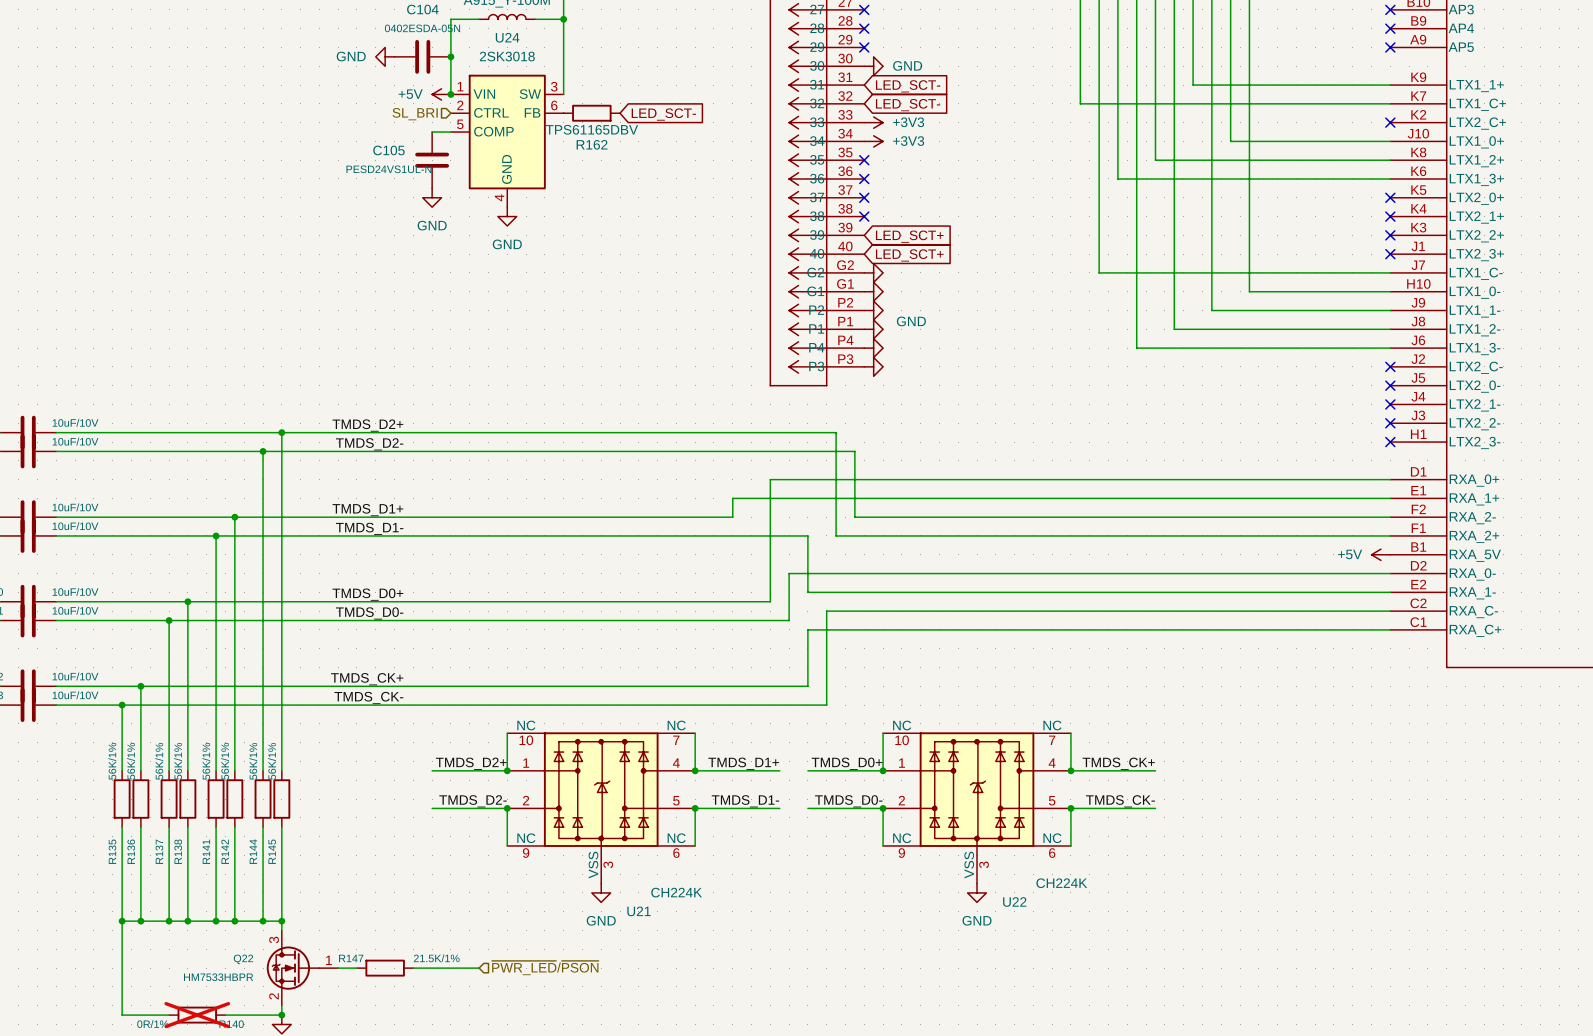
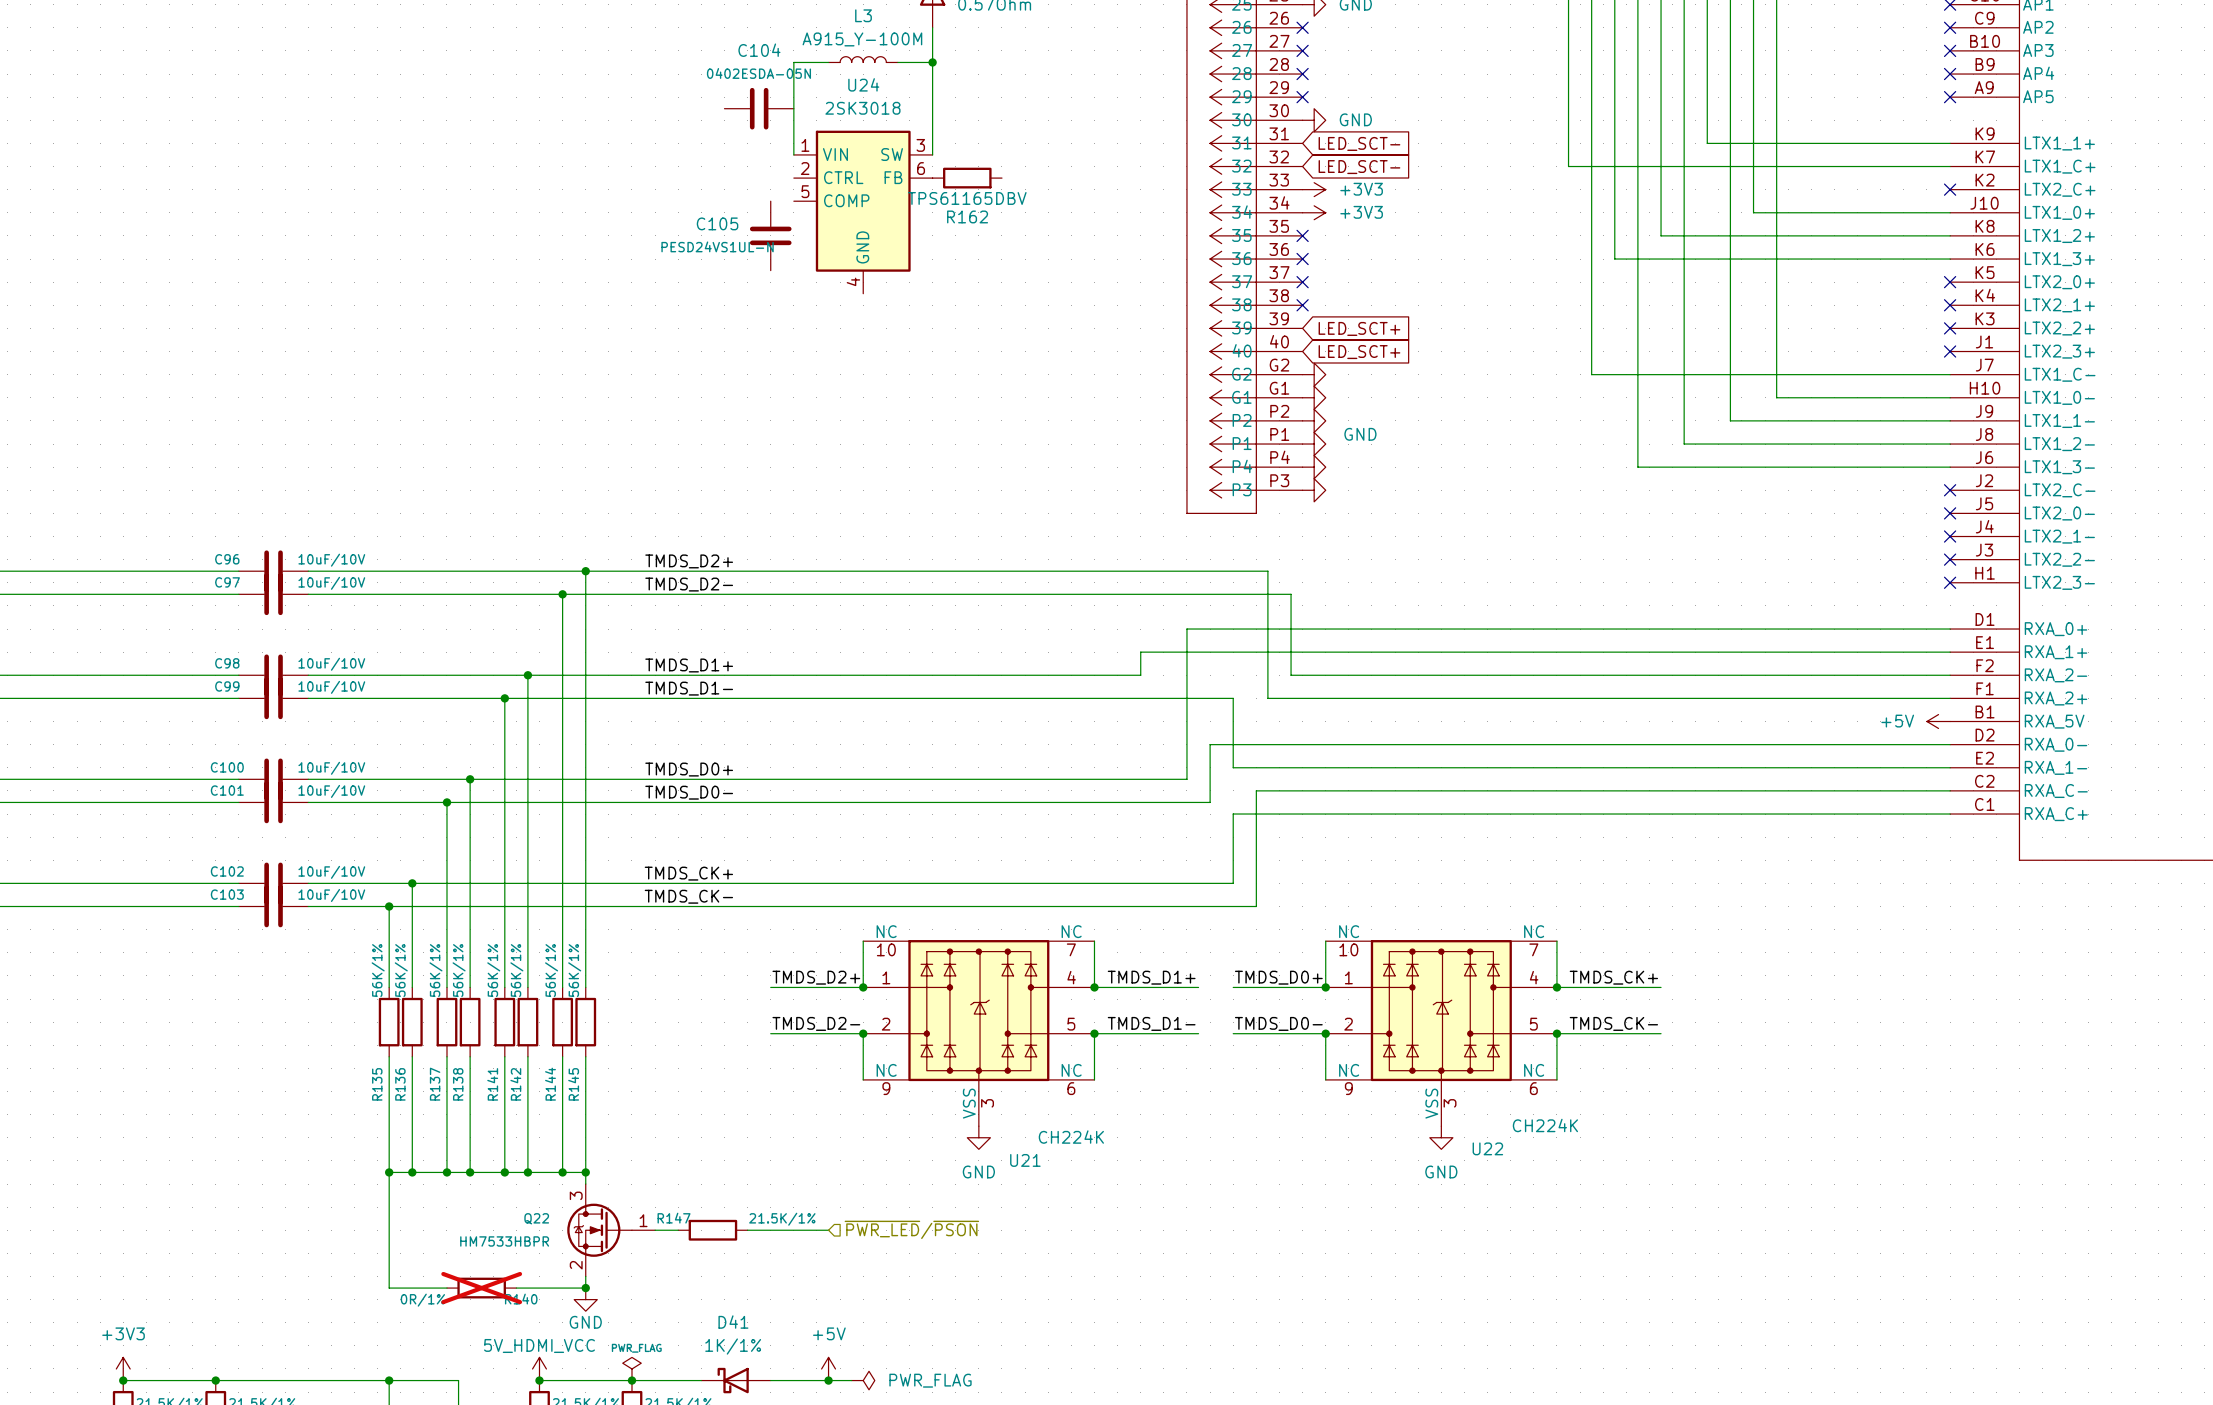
power symbol: GND (385, 56) -> none
junction: (450, 56) -> none
power symbol: +5V (441, 94) -> none
junction: (450, 94) -> none
hierarchical label: SL_BRI (415, 114) -> none
global label: LED_SCT- (663, 114) -> none
wire: (432, 132) (450, 132) -> none
power symbol: GND (432, 197) -> none
power symbol: GND (507, 216) -> none

